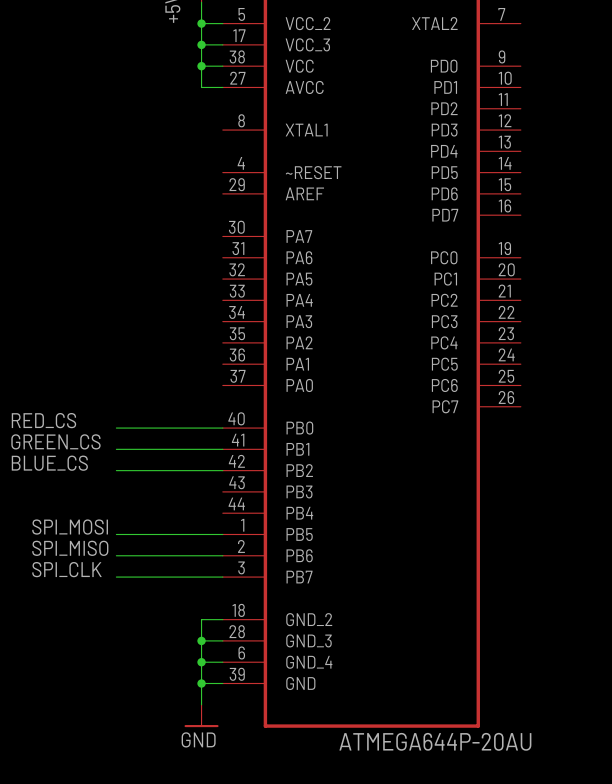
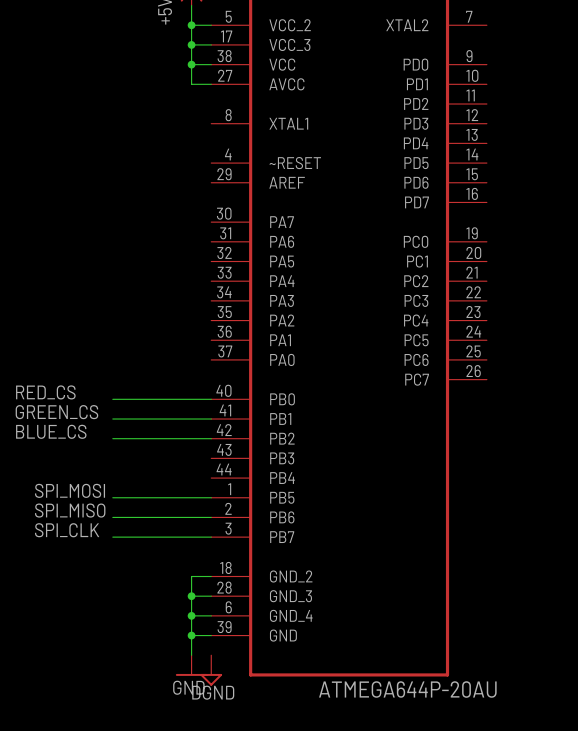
power symbol: none -> DGND (211, 670)

